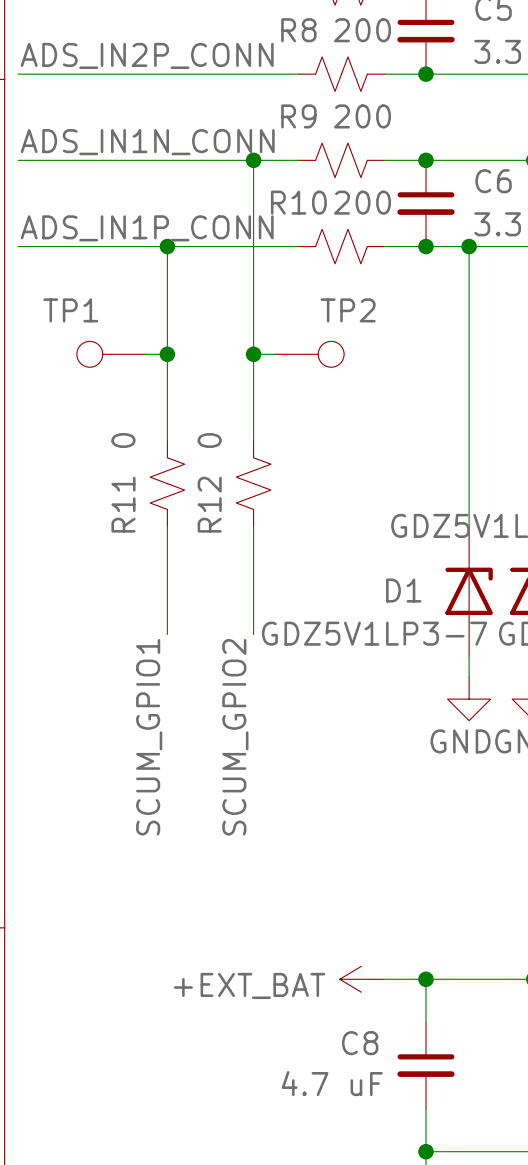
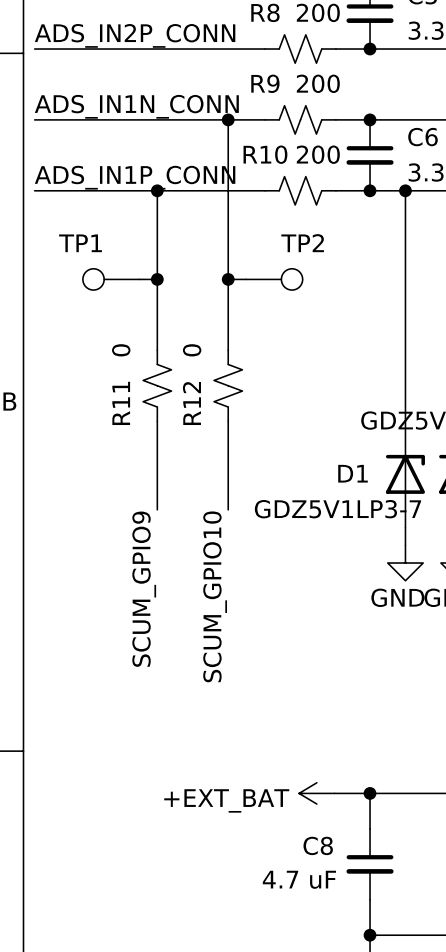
label: SCUM_GPIO1 (149, 737) -> SCUM_GPIO9 (144, 589)
label: SCUM_GPIO2 (235, 737) -> SCUM_GPIO10 (215, 596)

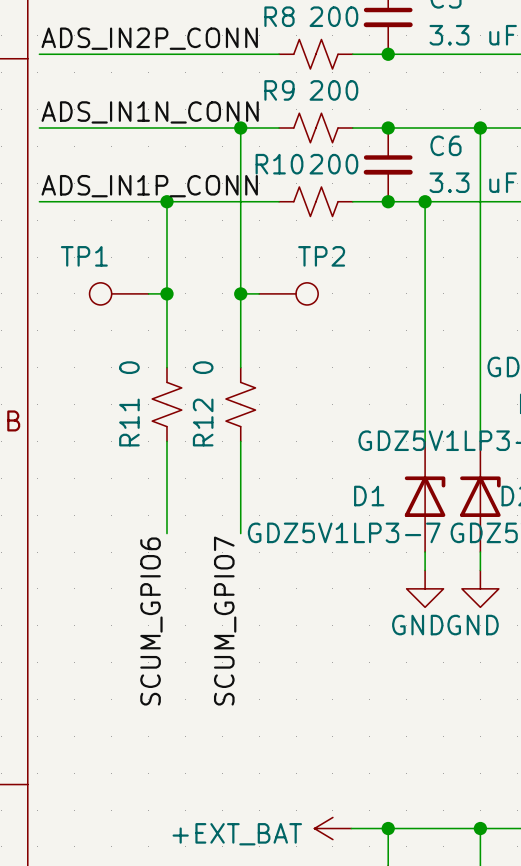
label: SCUM_GPIO9 (144, 589) -> SCUM_GPIO6 (151, 621)
label: SCUM_GPIO10 (215, 596) -> SCUM_GPIO7 (225, 621)

